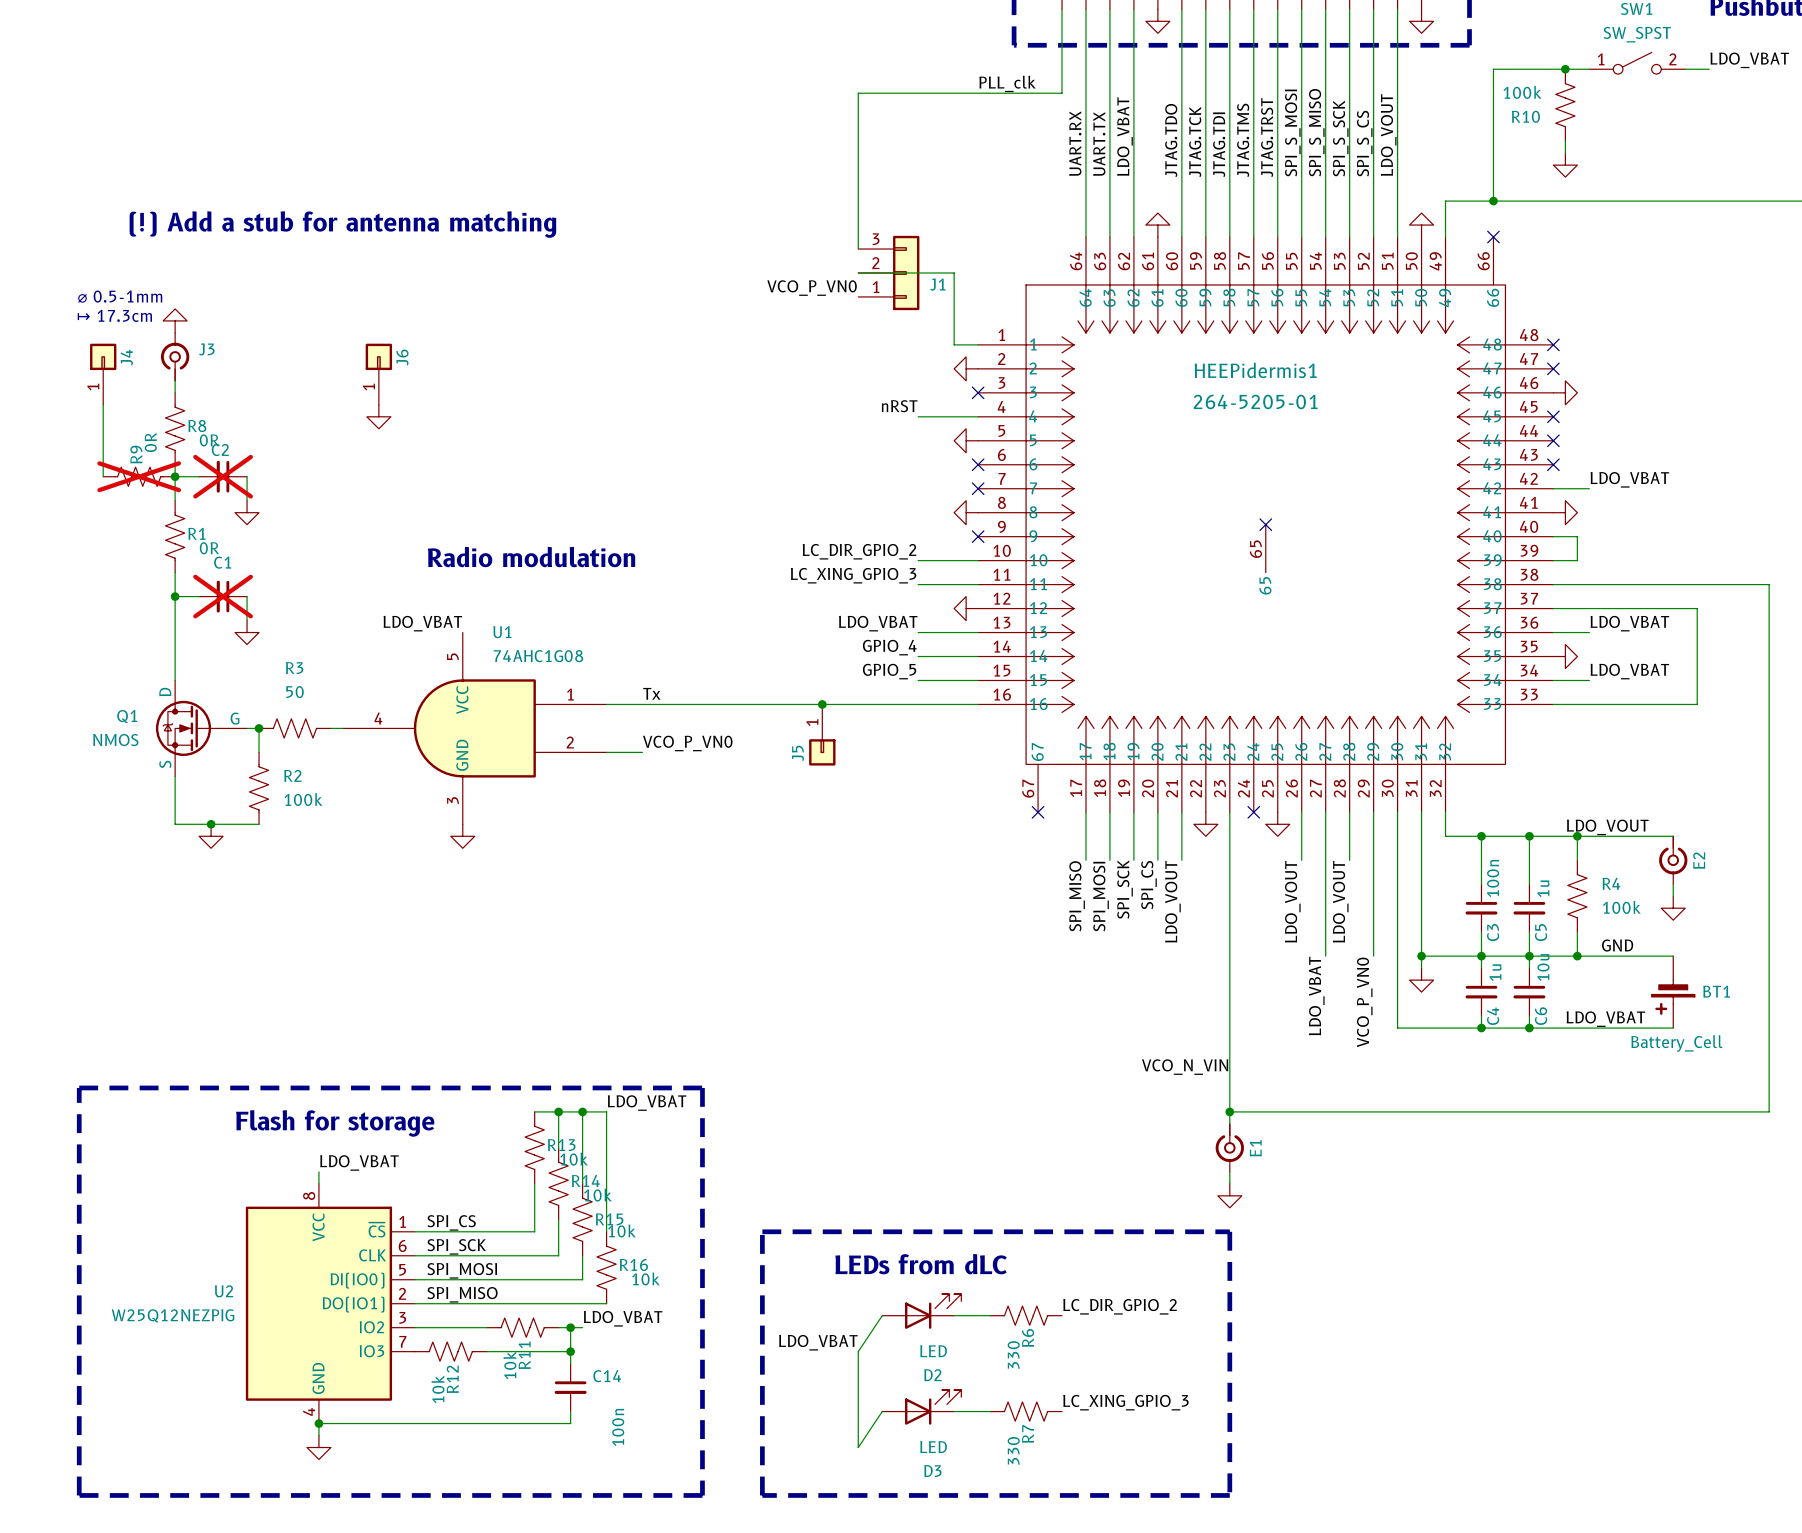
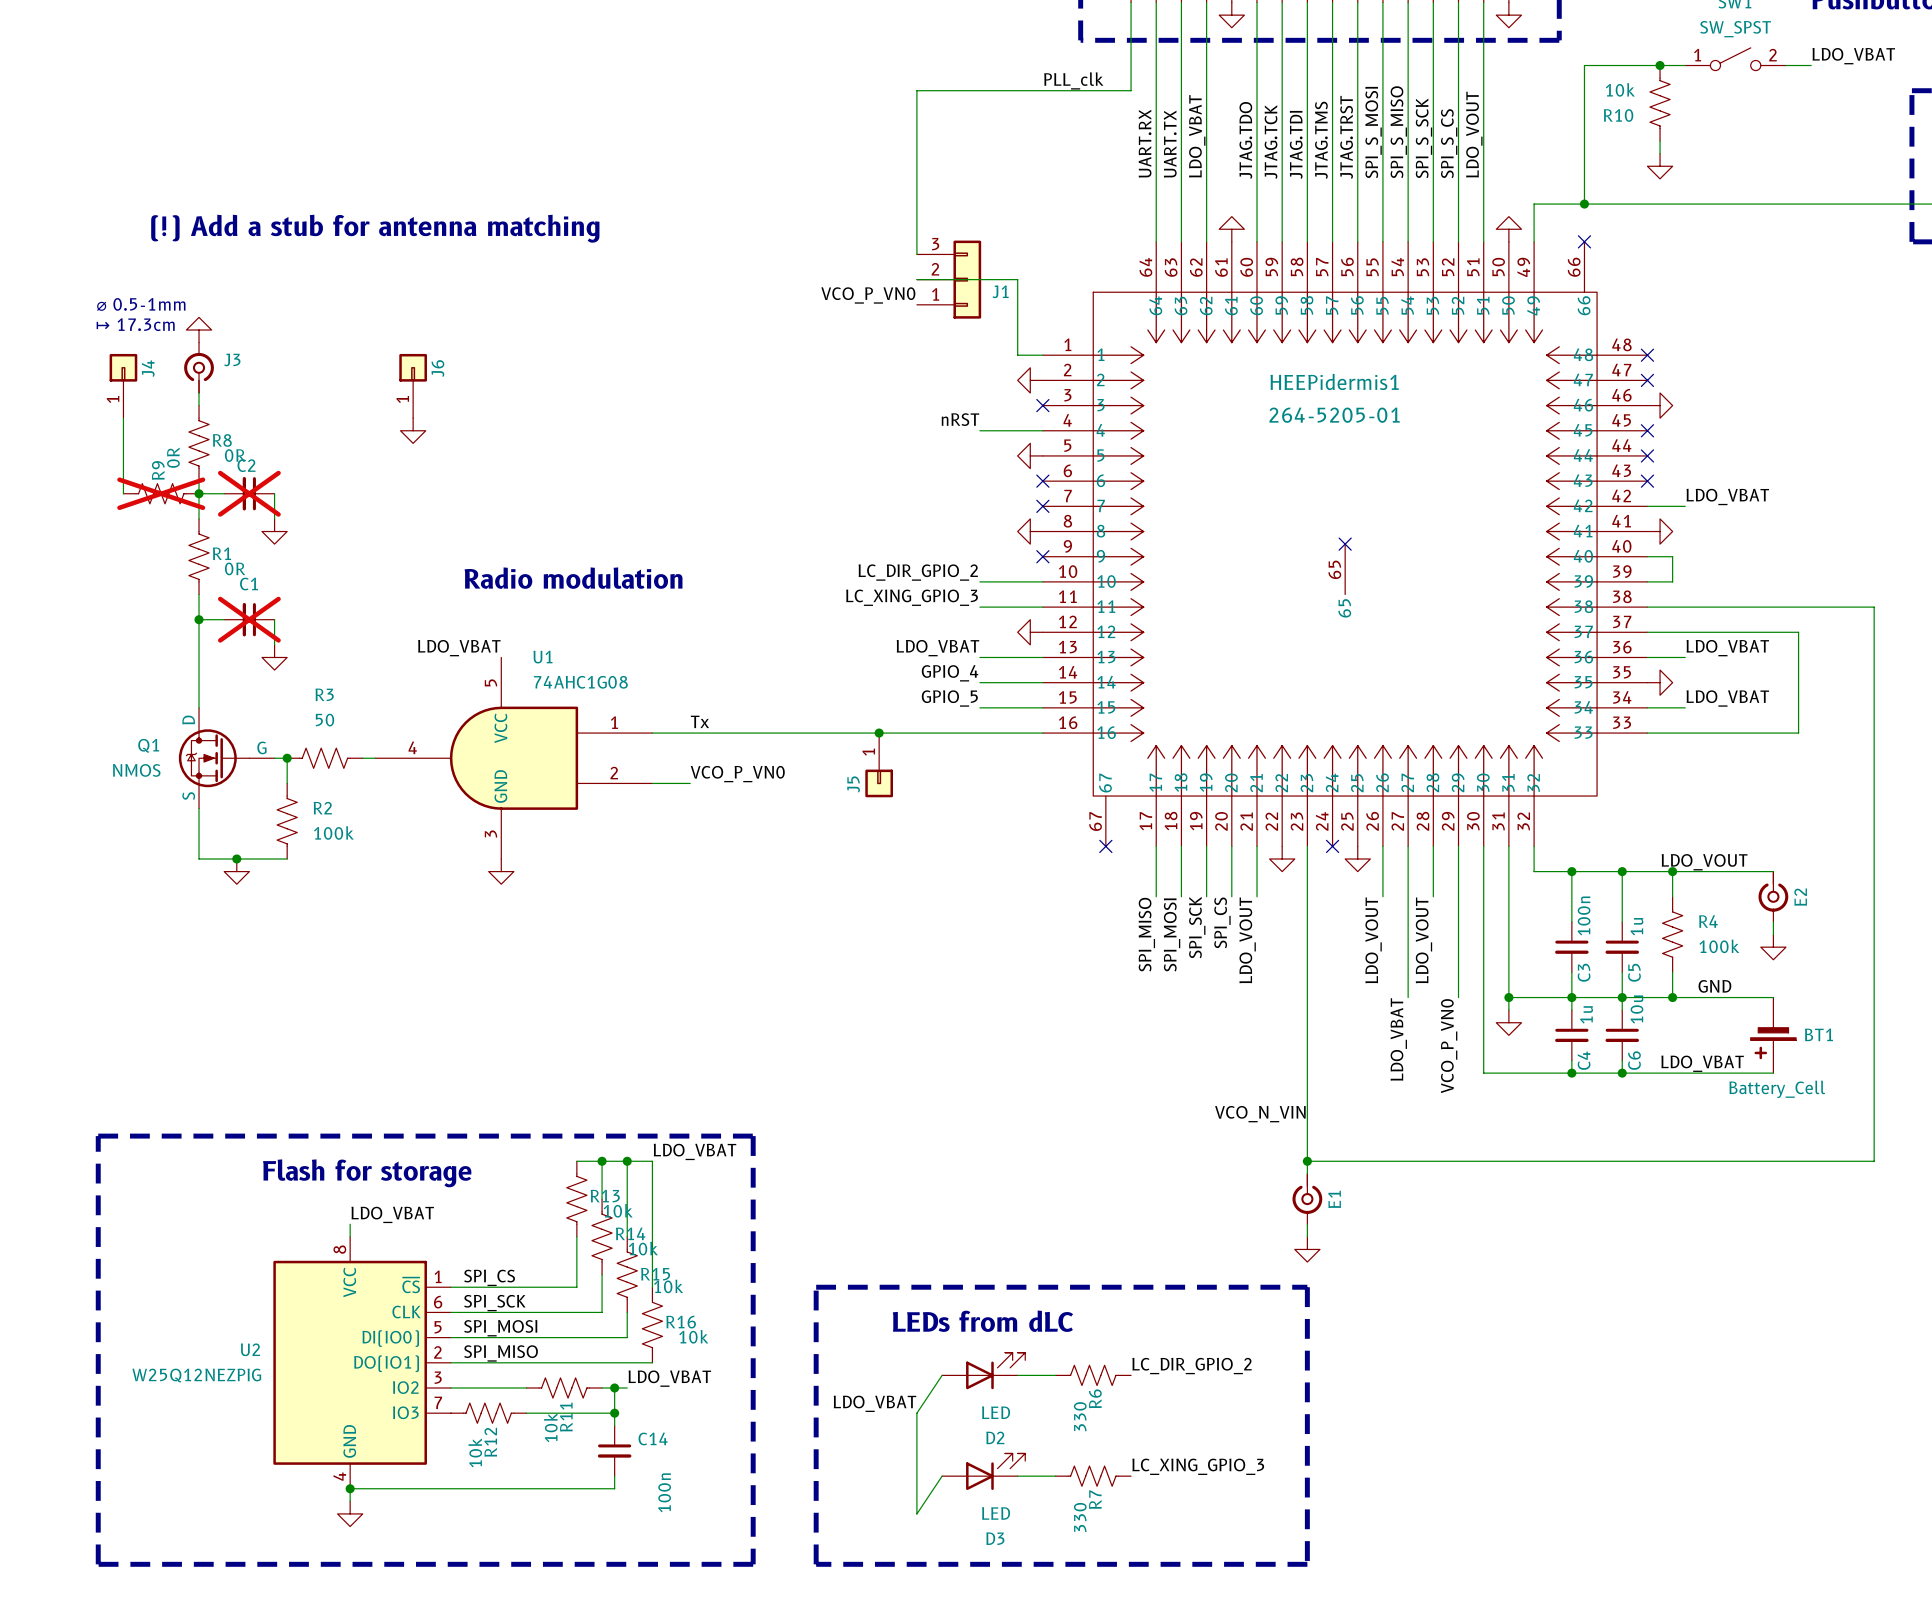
R10 value: 100k (1522, 92) -> 10k (1620, 89)

